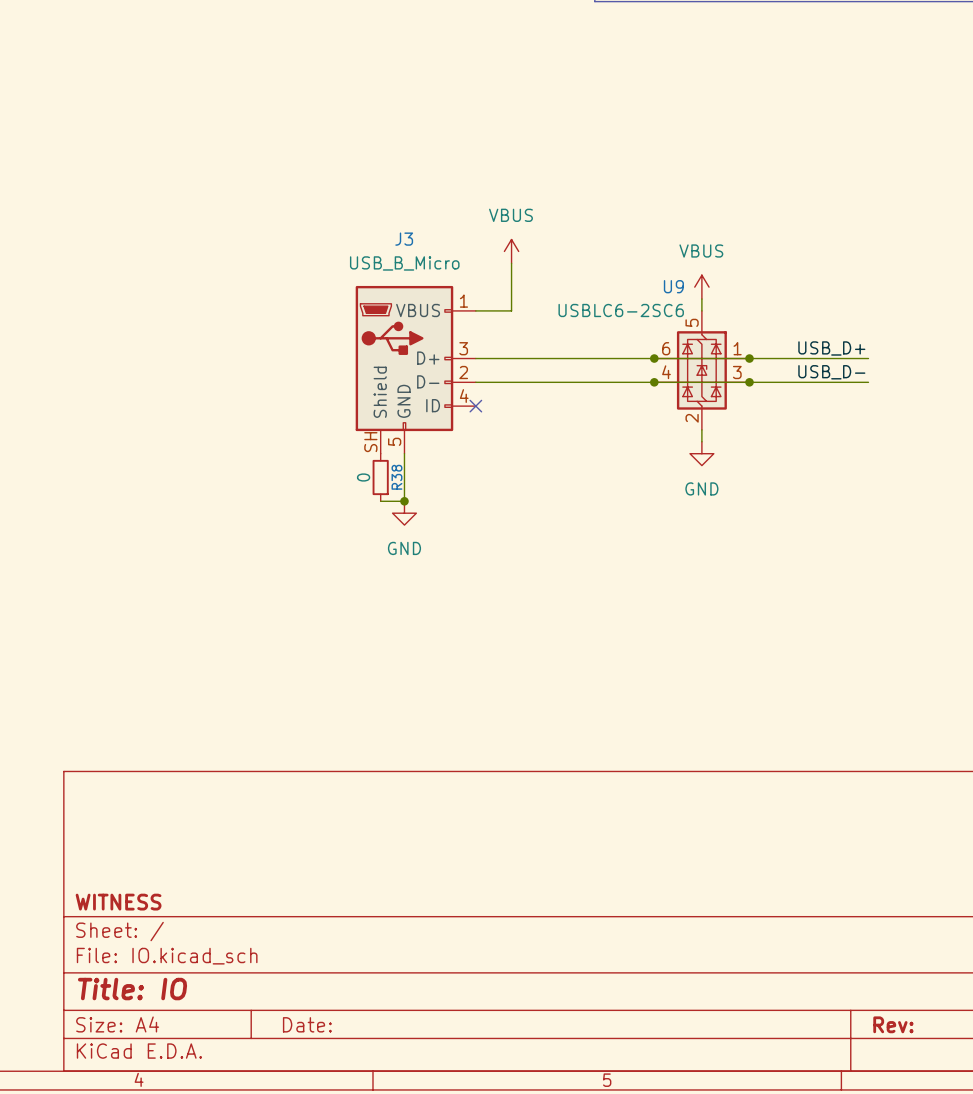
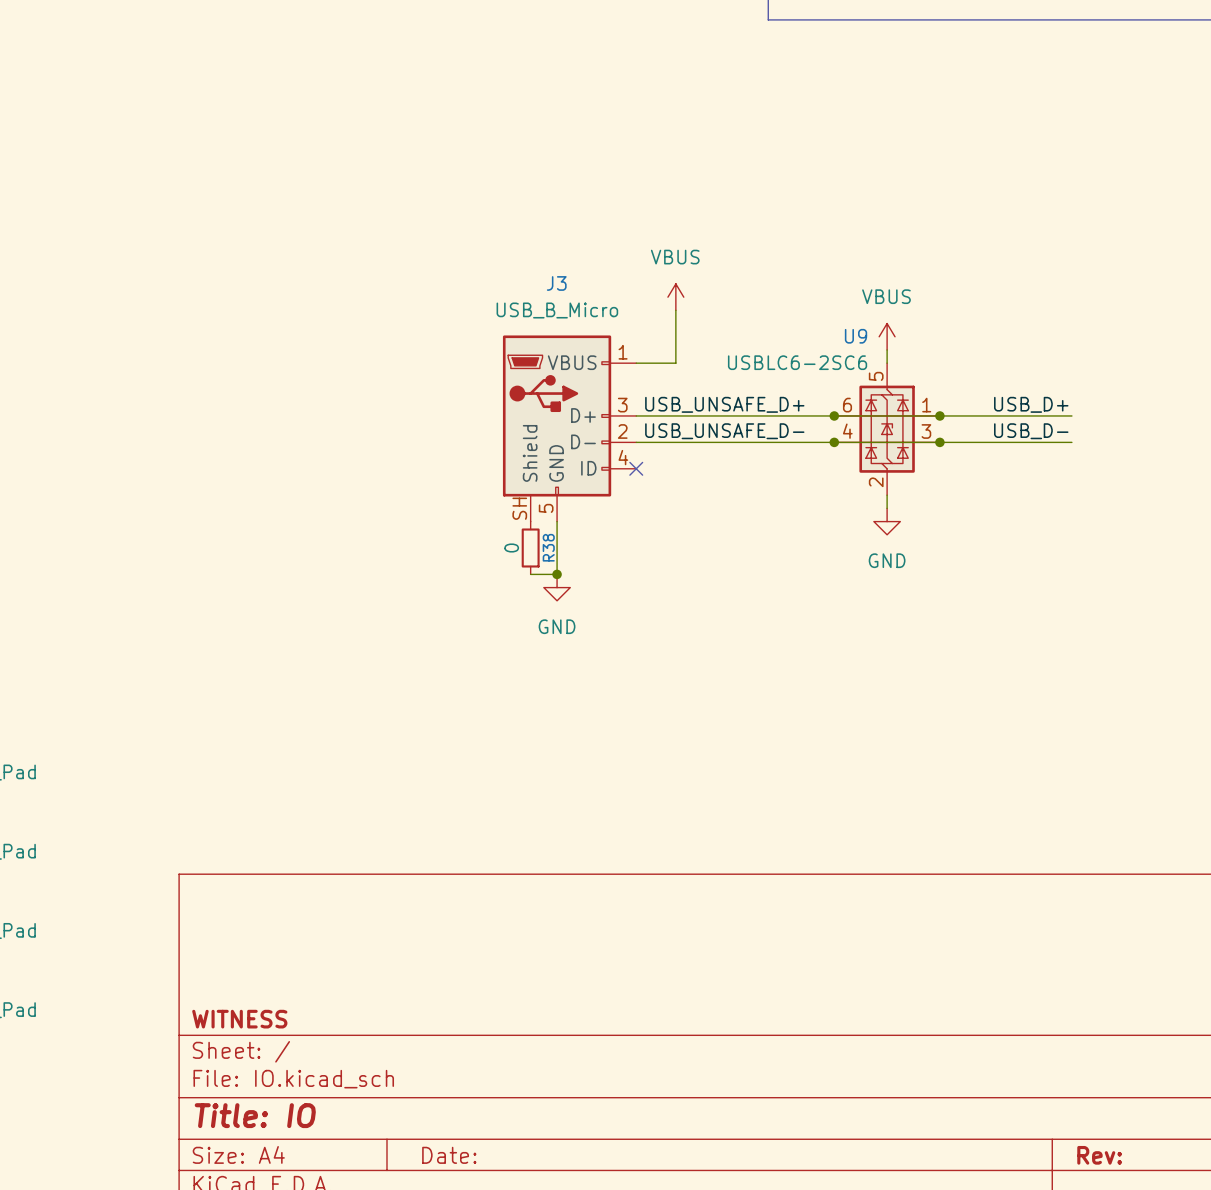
label: none -> USB_UNSAFE_D+ (724, 404)
label: none -> USB_UNSAFE_D- (724, 431)

